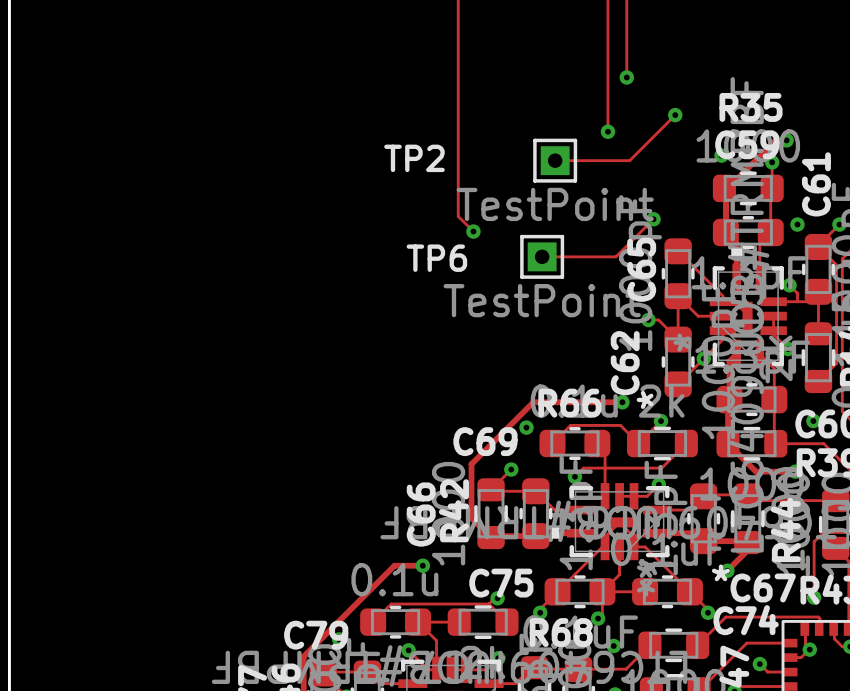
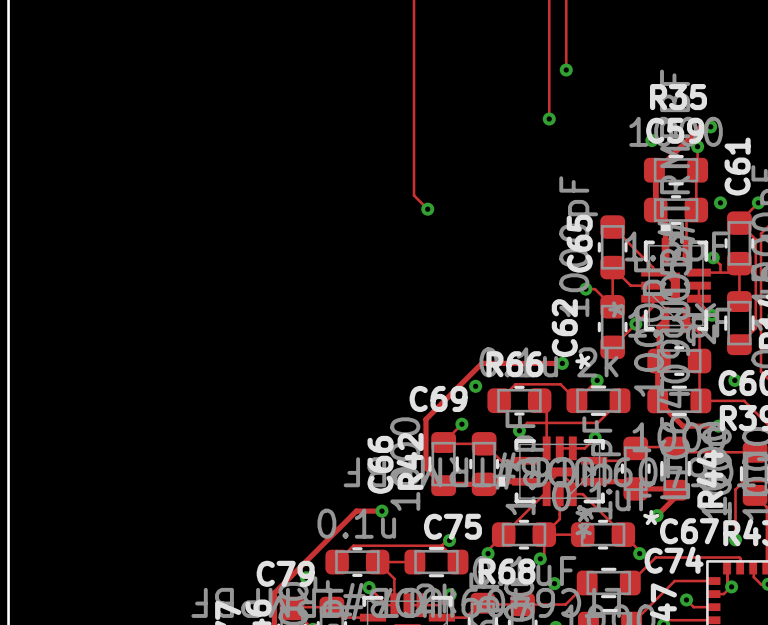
track: (675, 115) (629, 160) (555, 160) -> none
via: (675, 115) -> none
TP2: TestPoint (555, 160) -> none
track: (653, 219) (615, 256) (542, 256) -> none
via: (653, 219) -> none
TP6: TestPoint (542, 256) -> none

